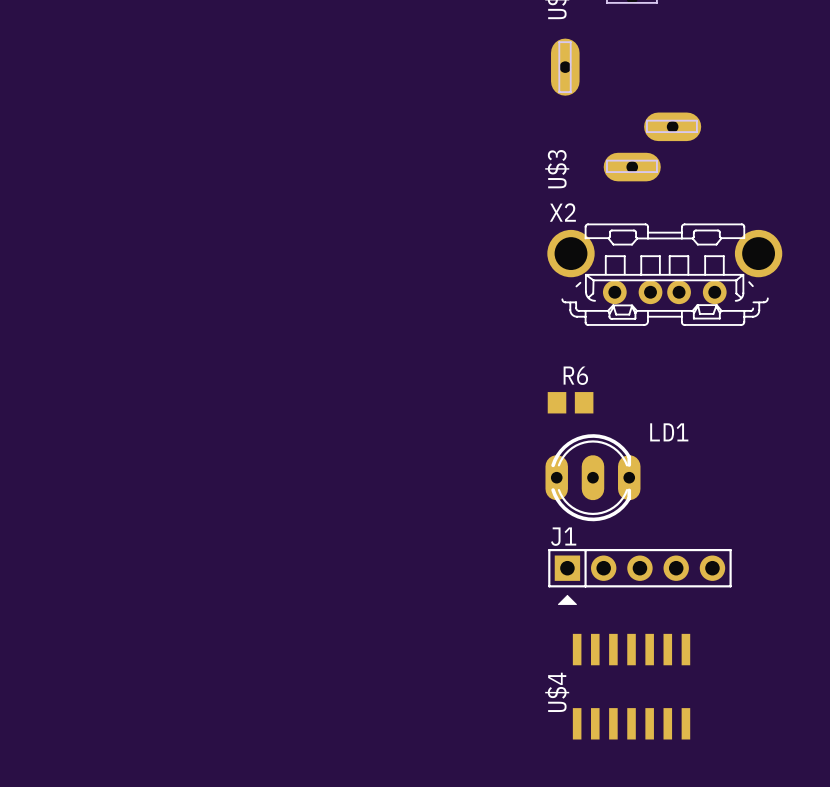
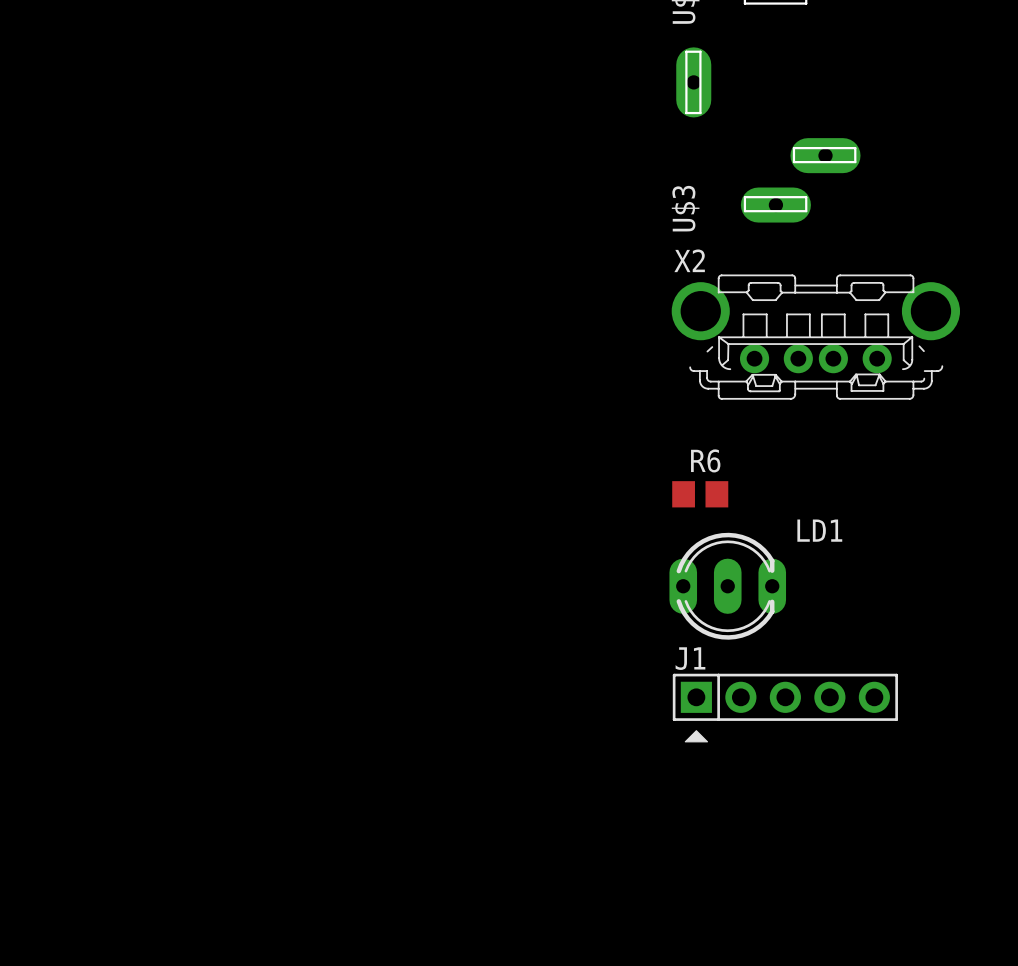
U$4: (631, 686) -> none

